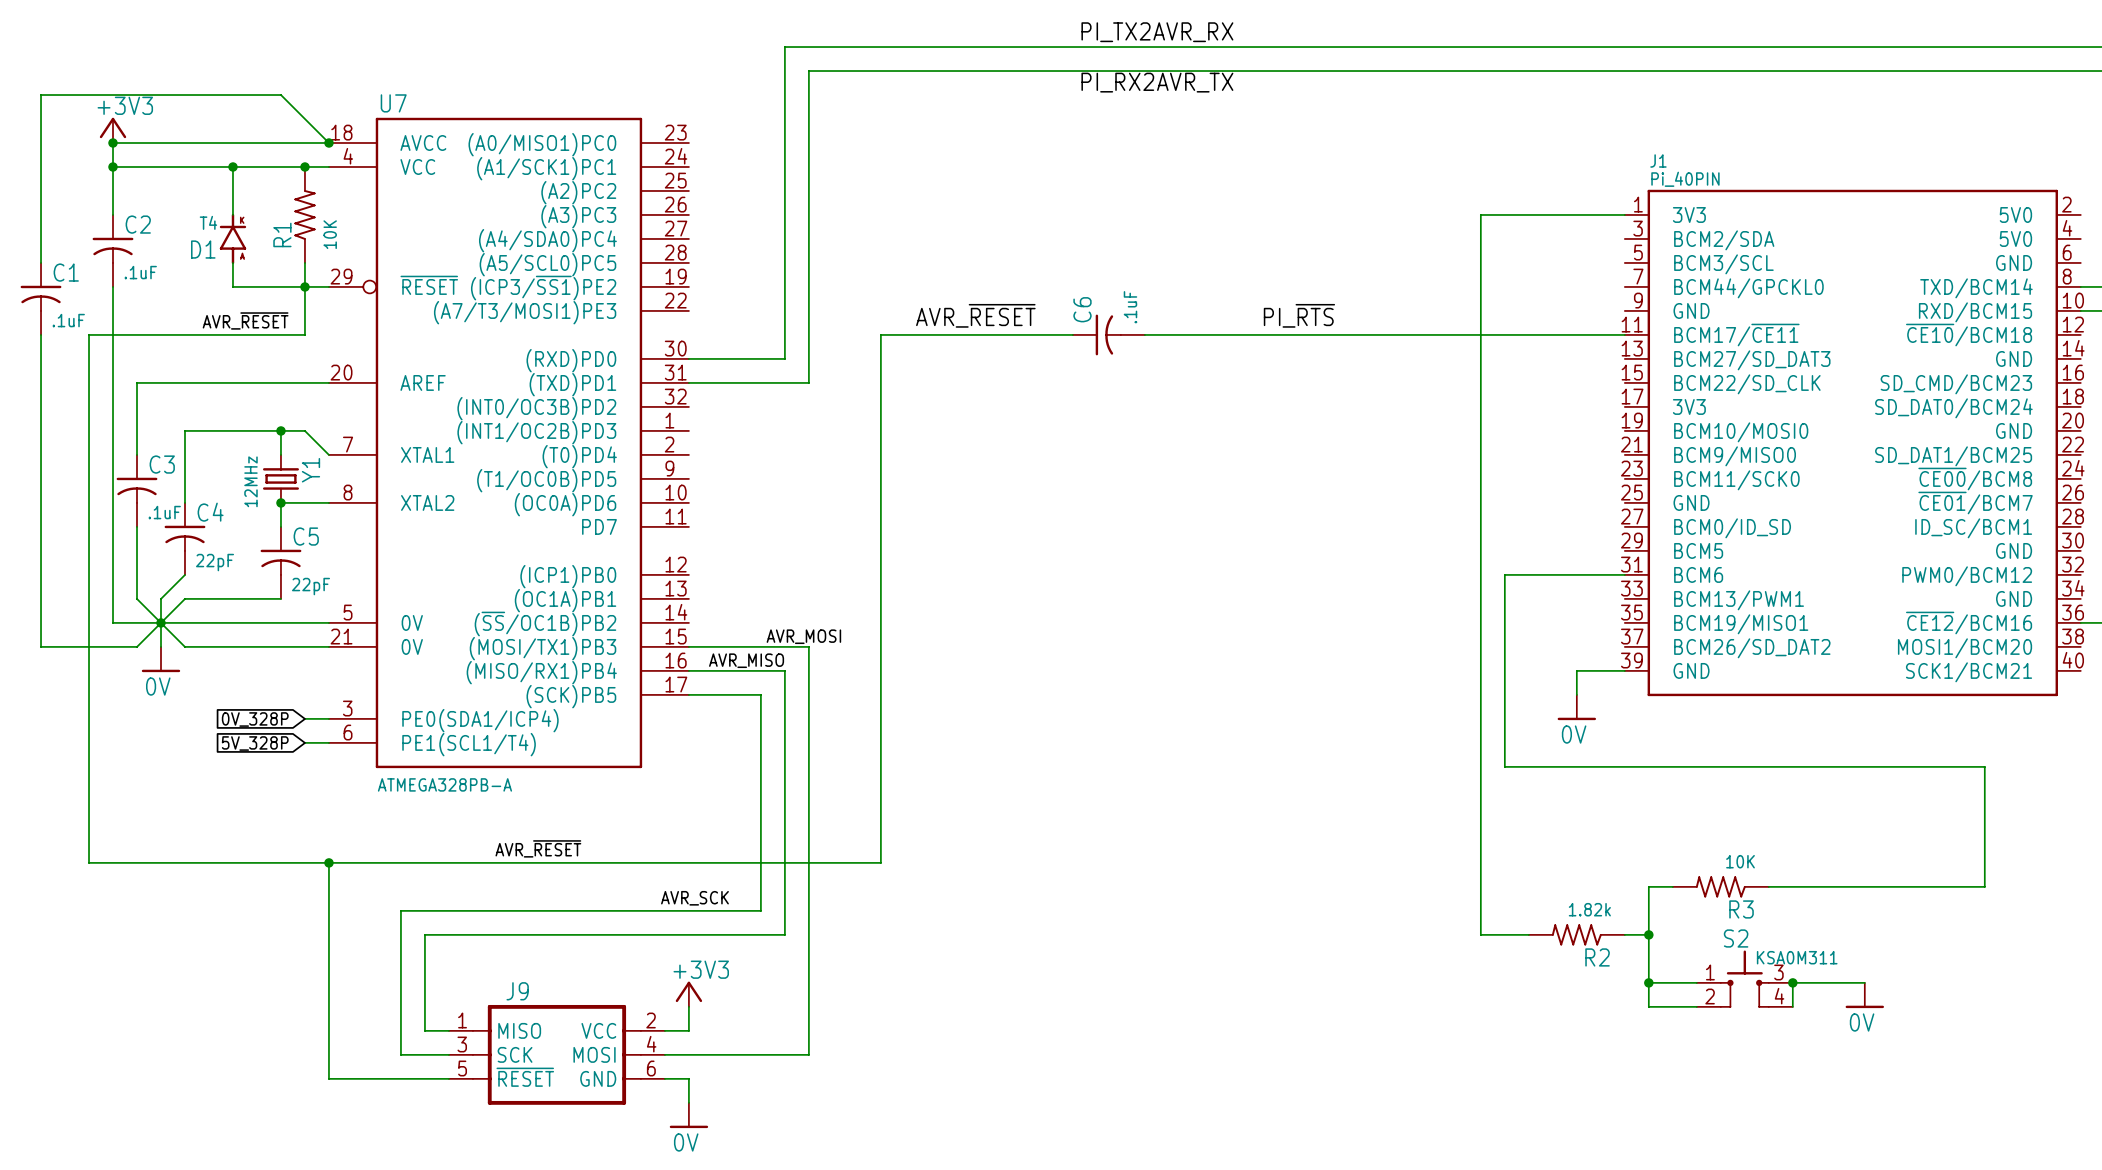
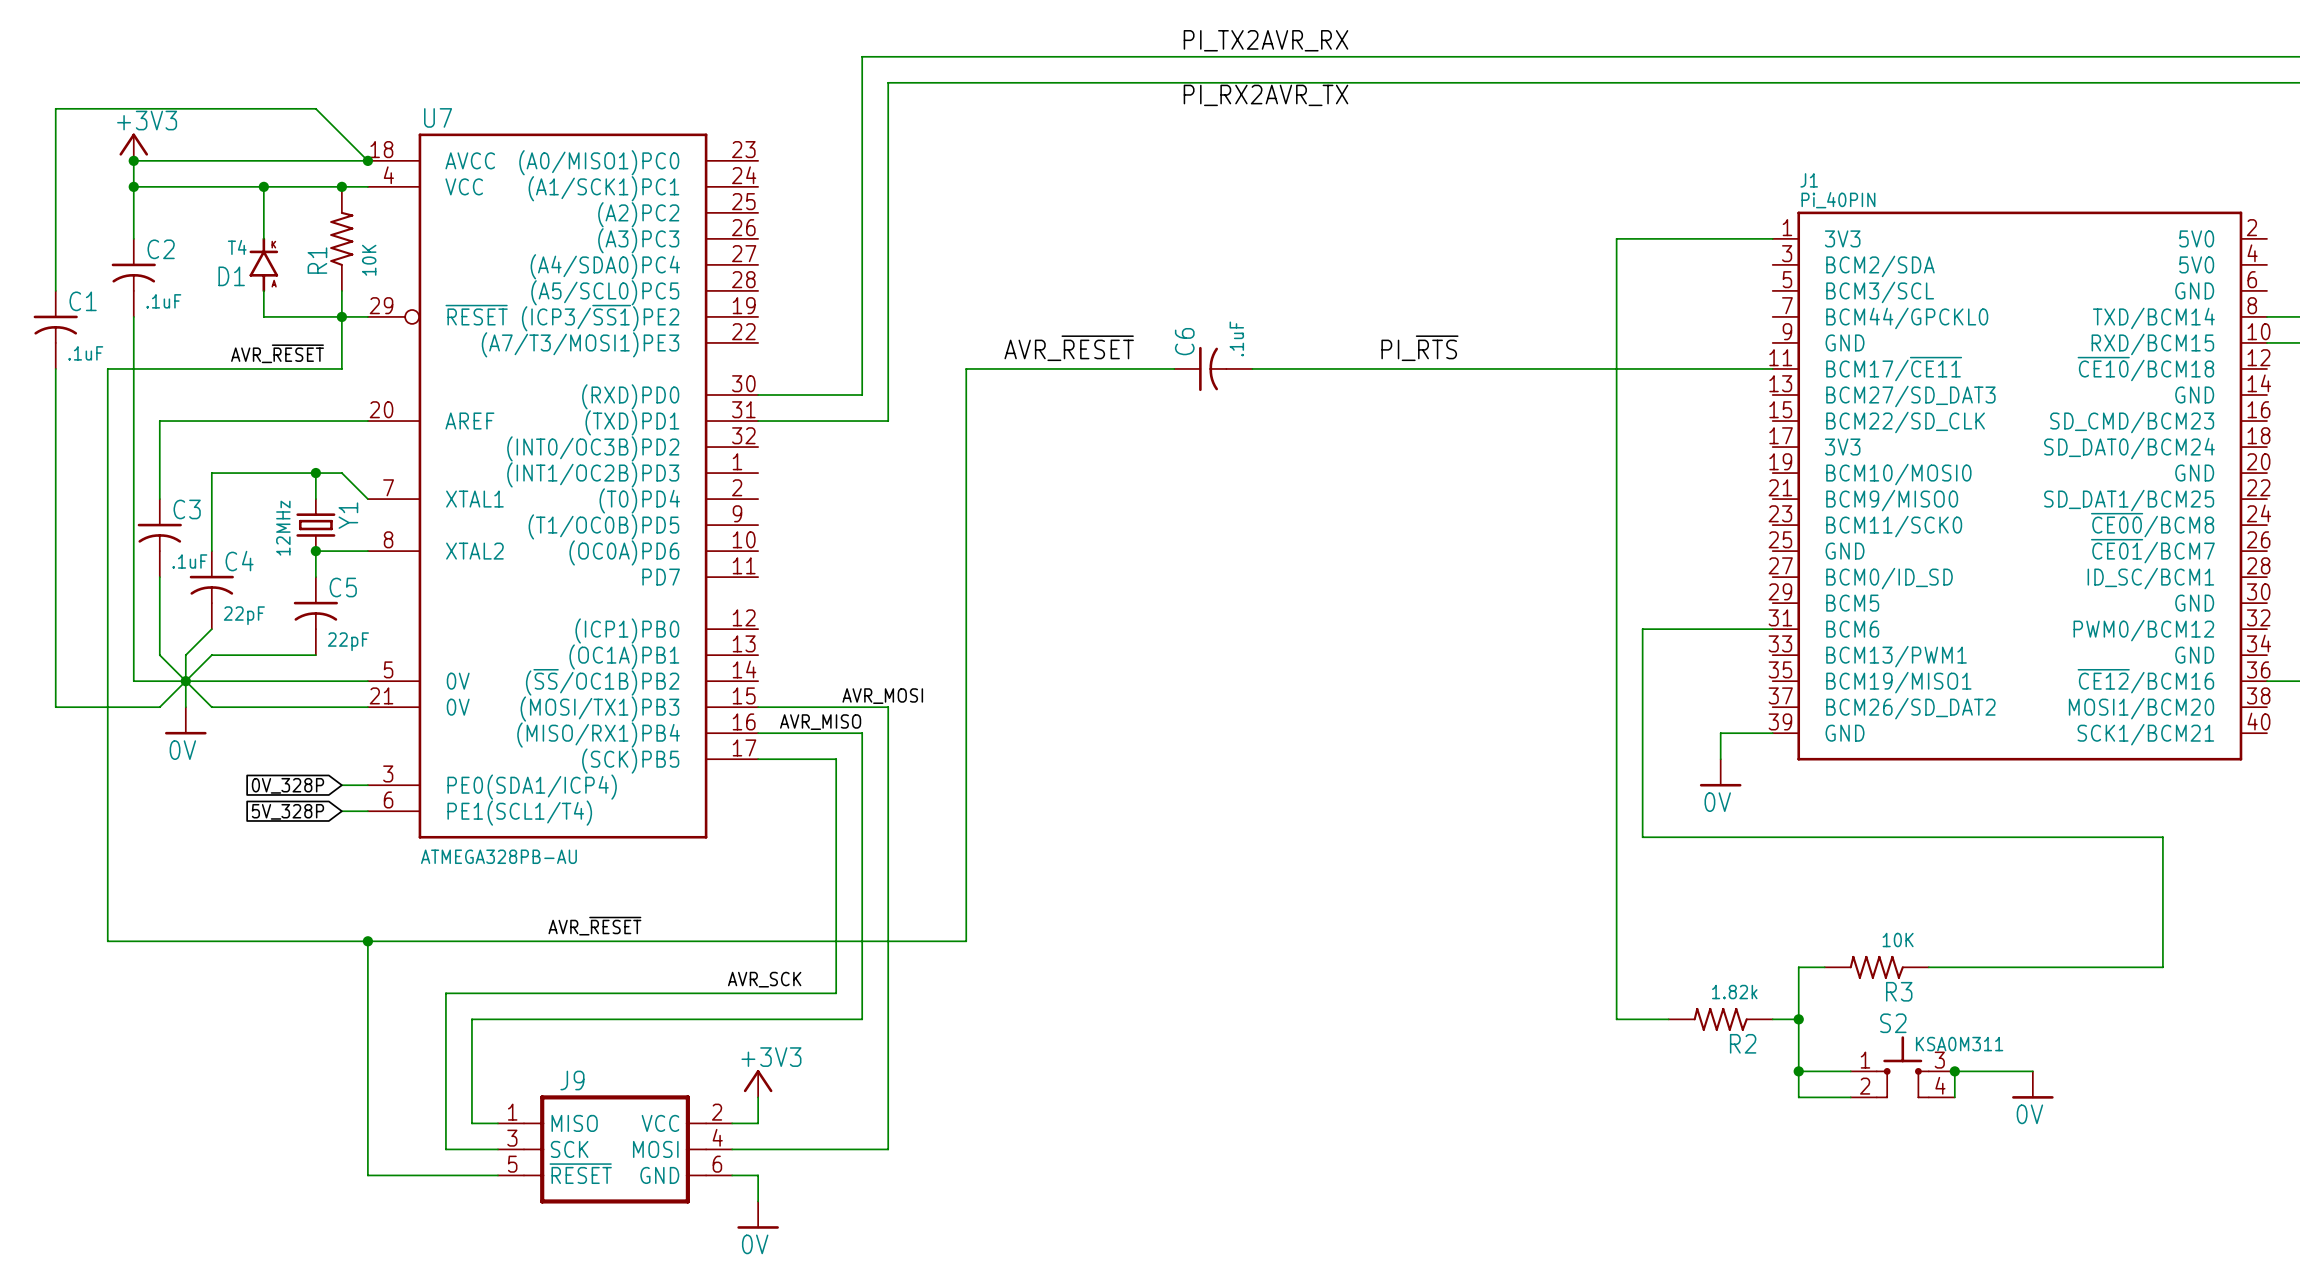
U7 value: ATMEGA328PB-A (444, 784) -> ATMEGA328PB-AU (498, 856)

